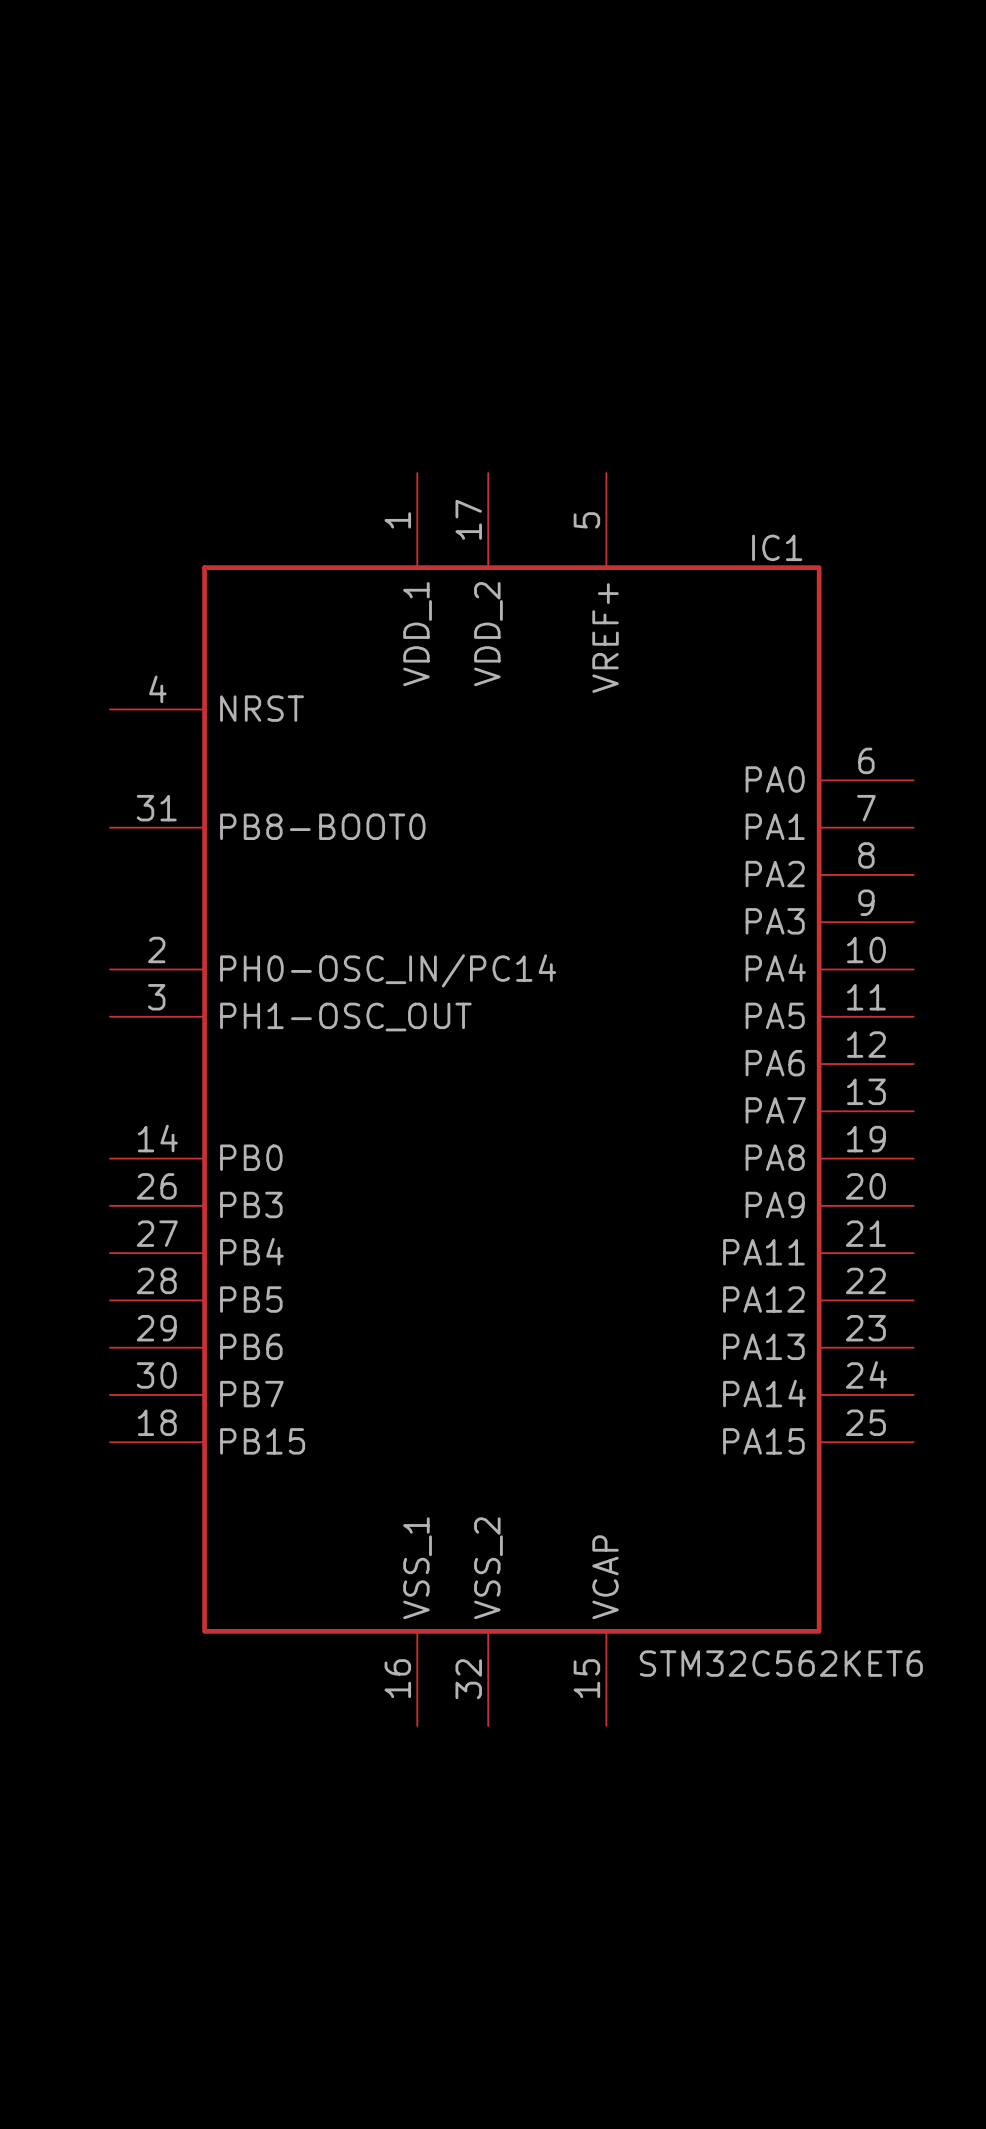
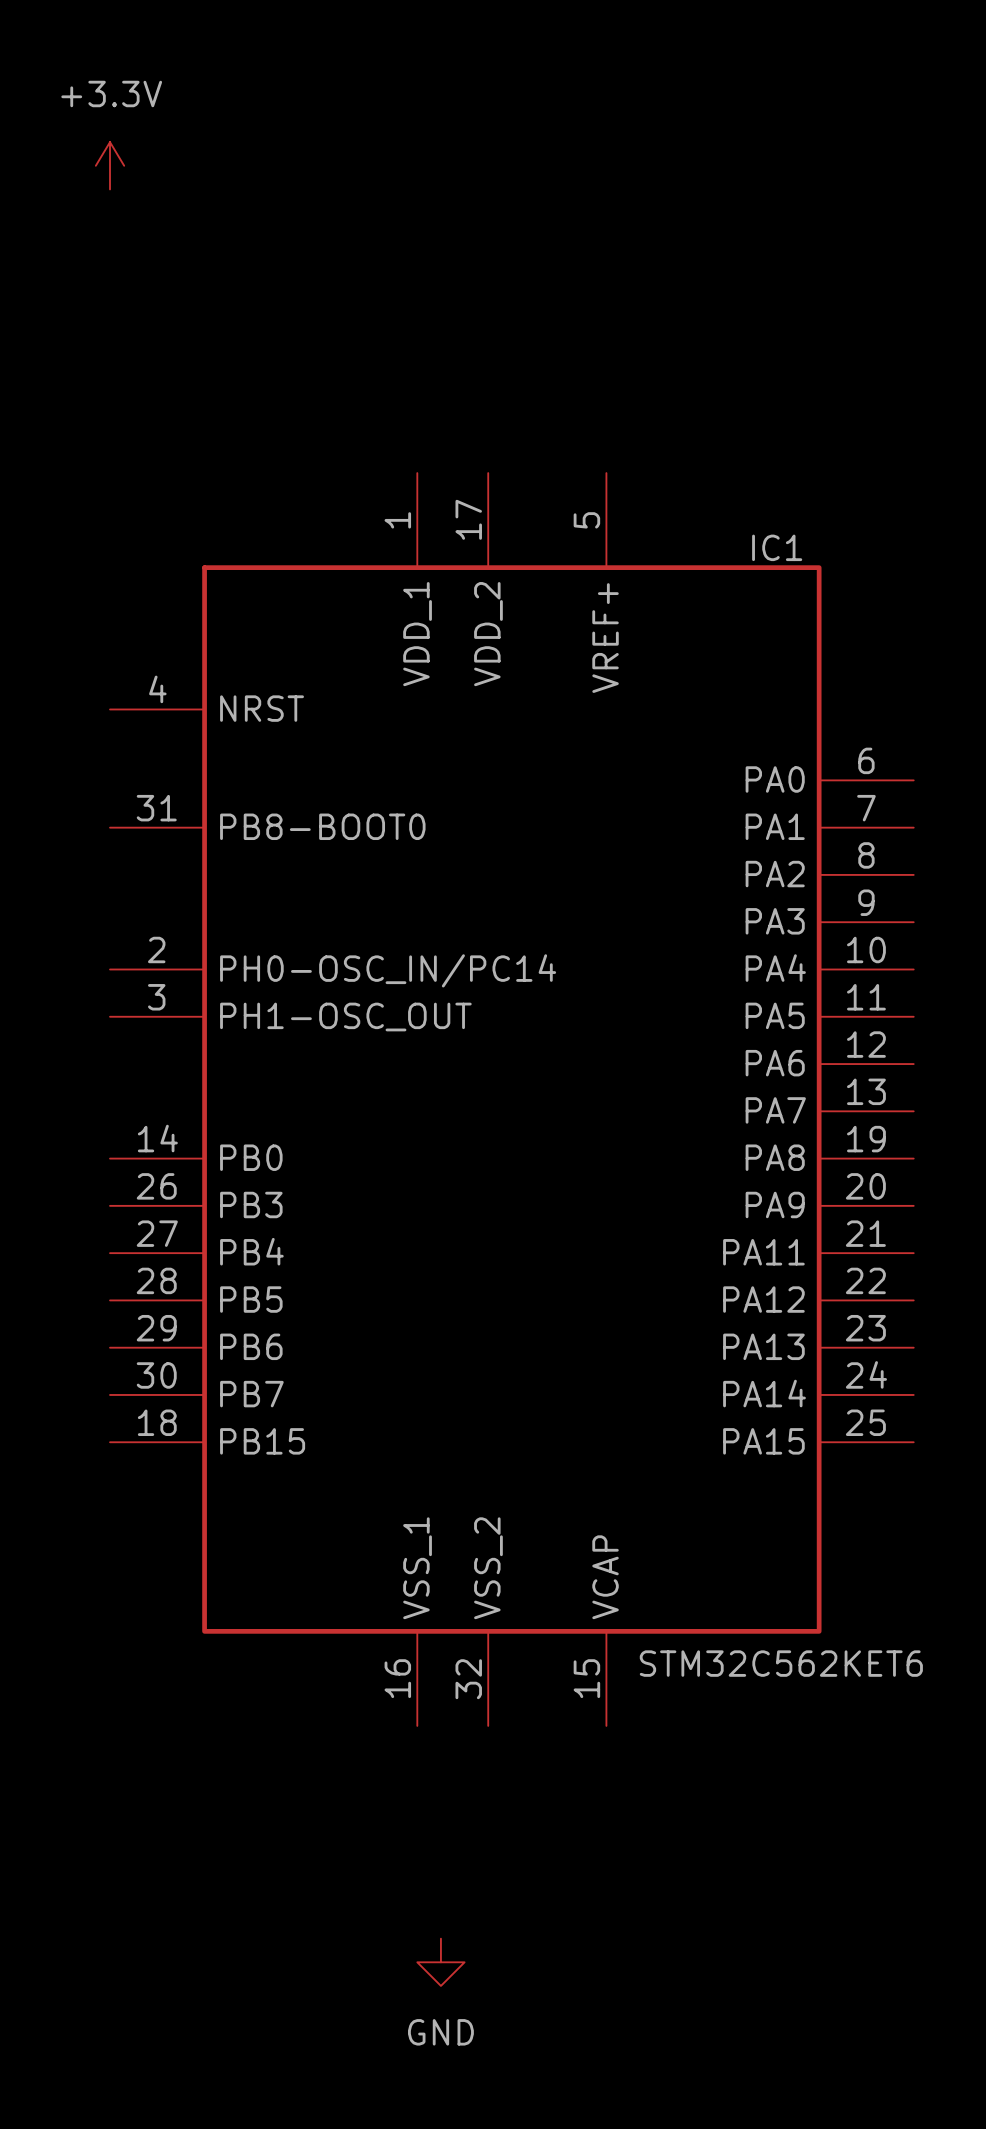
power symbol: none -> +3.3V (110, 165)
power symbol: none -> GND (440, 1962)

